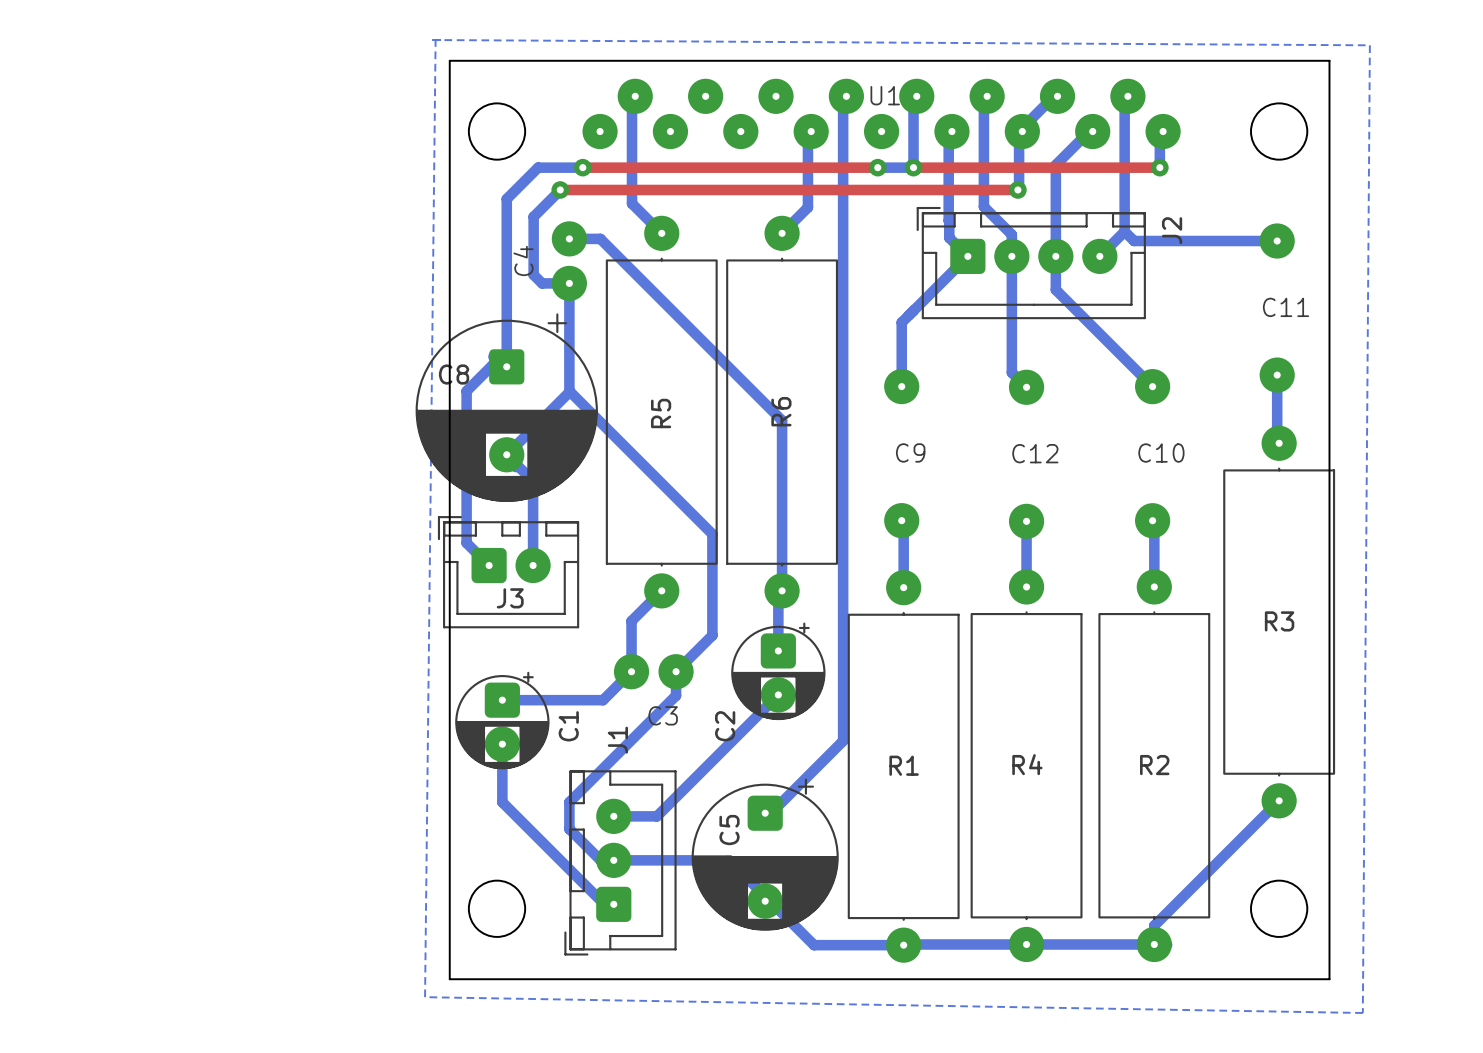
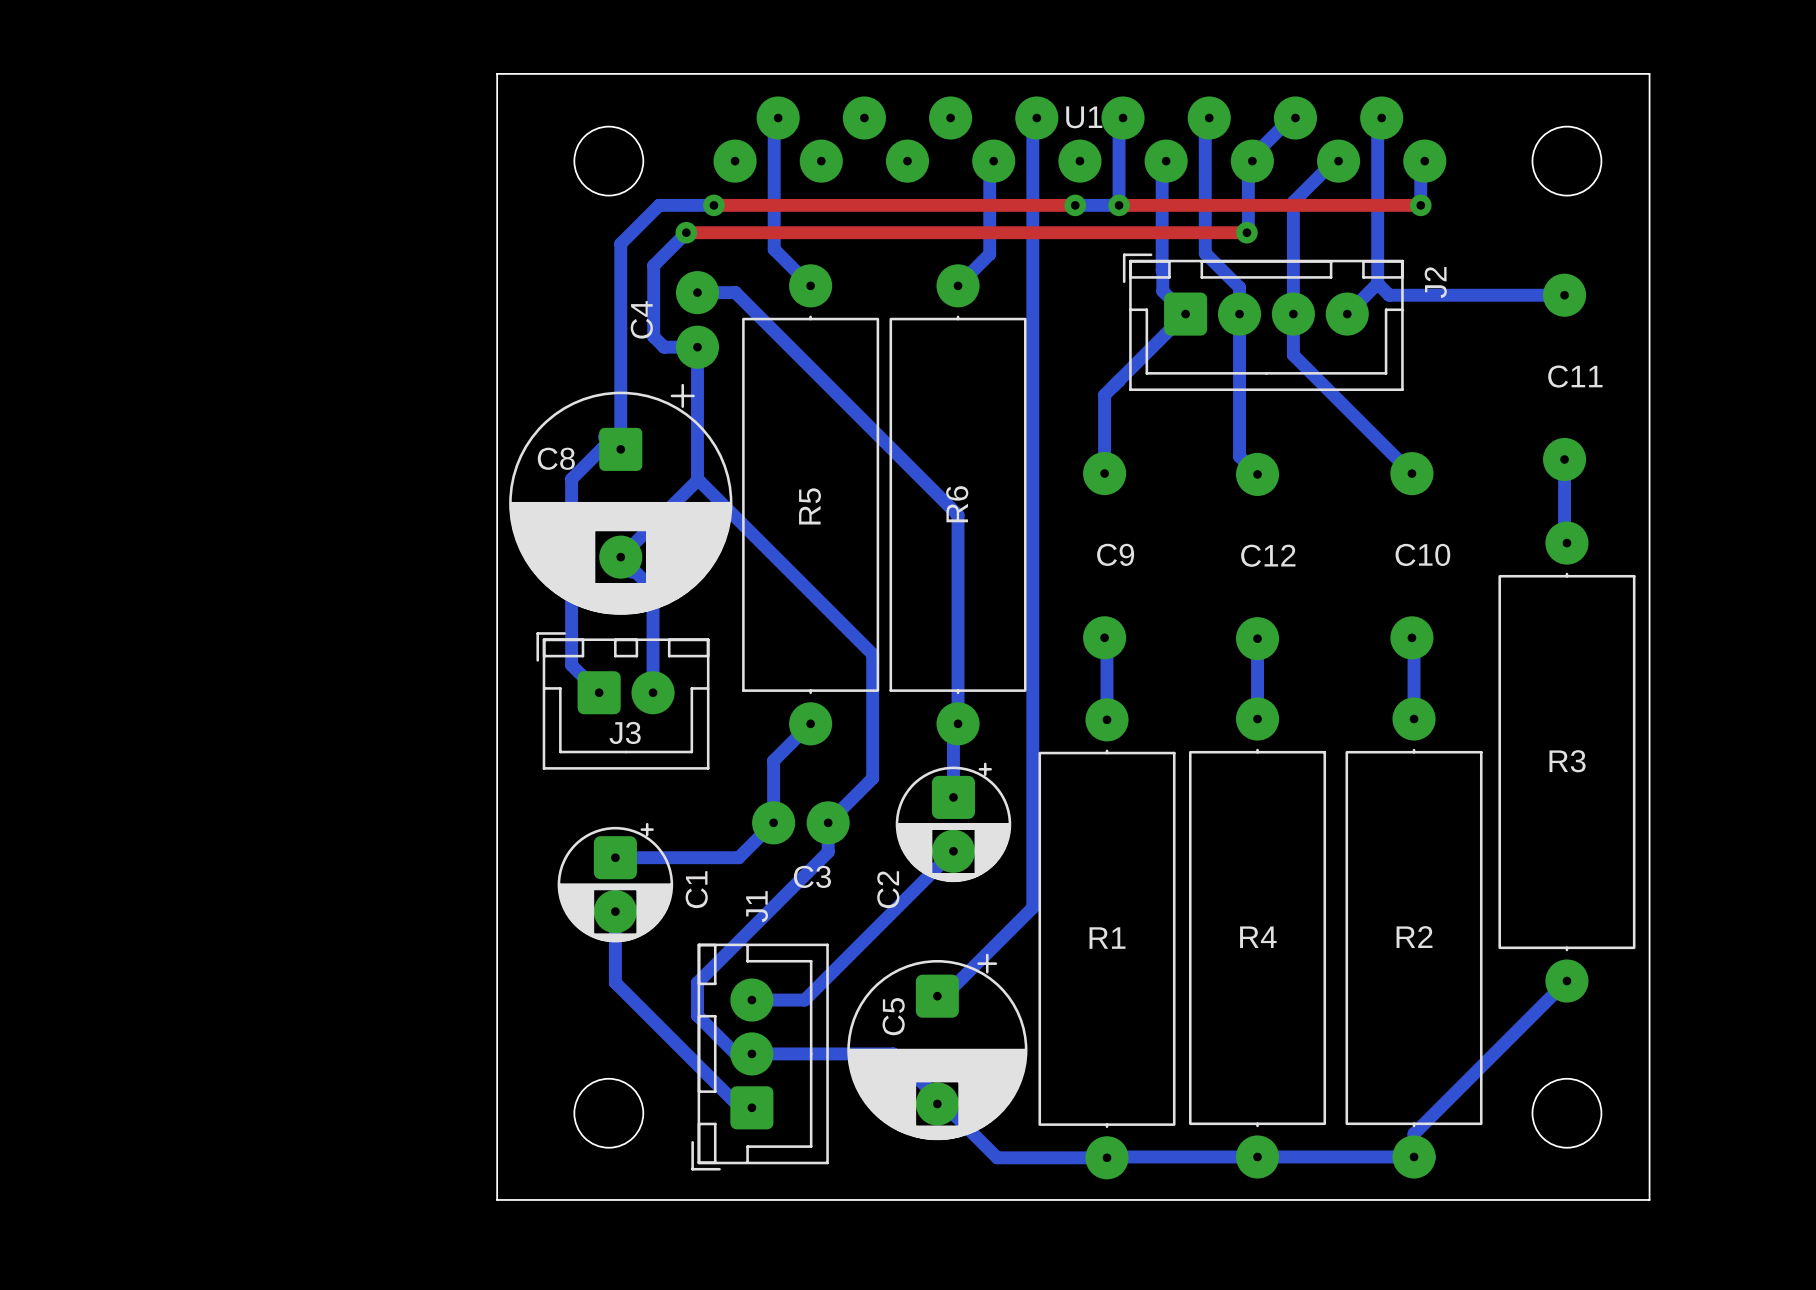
bottom zone outline: (435, 40) (425, 997) (1362, 1013) (1369, 45) (432, 40) (440, 40) -> none
board edge: (449, 60) (1329, 60) (1329, 979) (449, 979) (449, 60) -> (497, 73) (497, 1199) (1649, 1199) (1649, 73) (497, 73)

